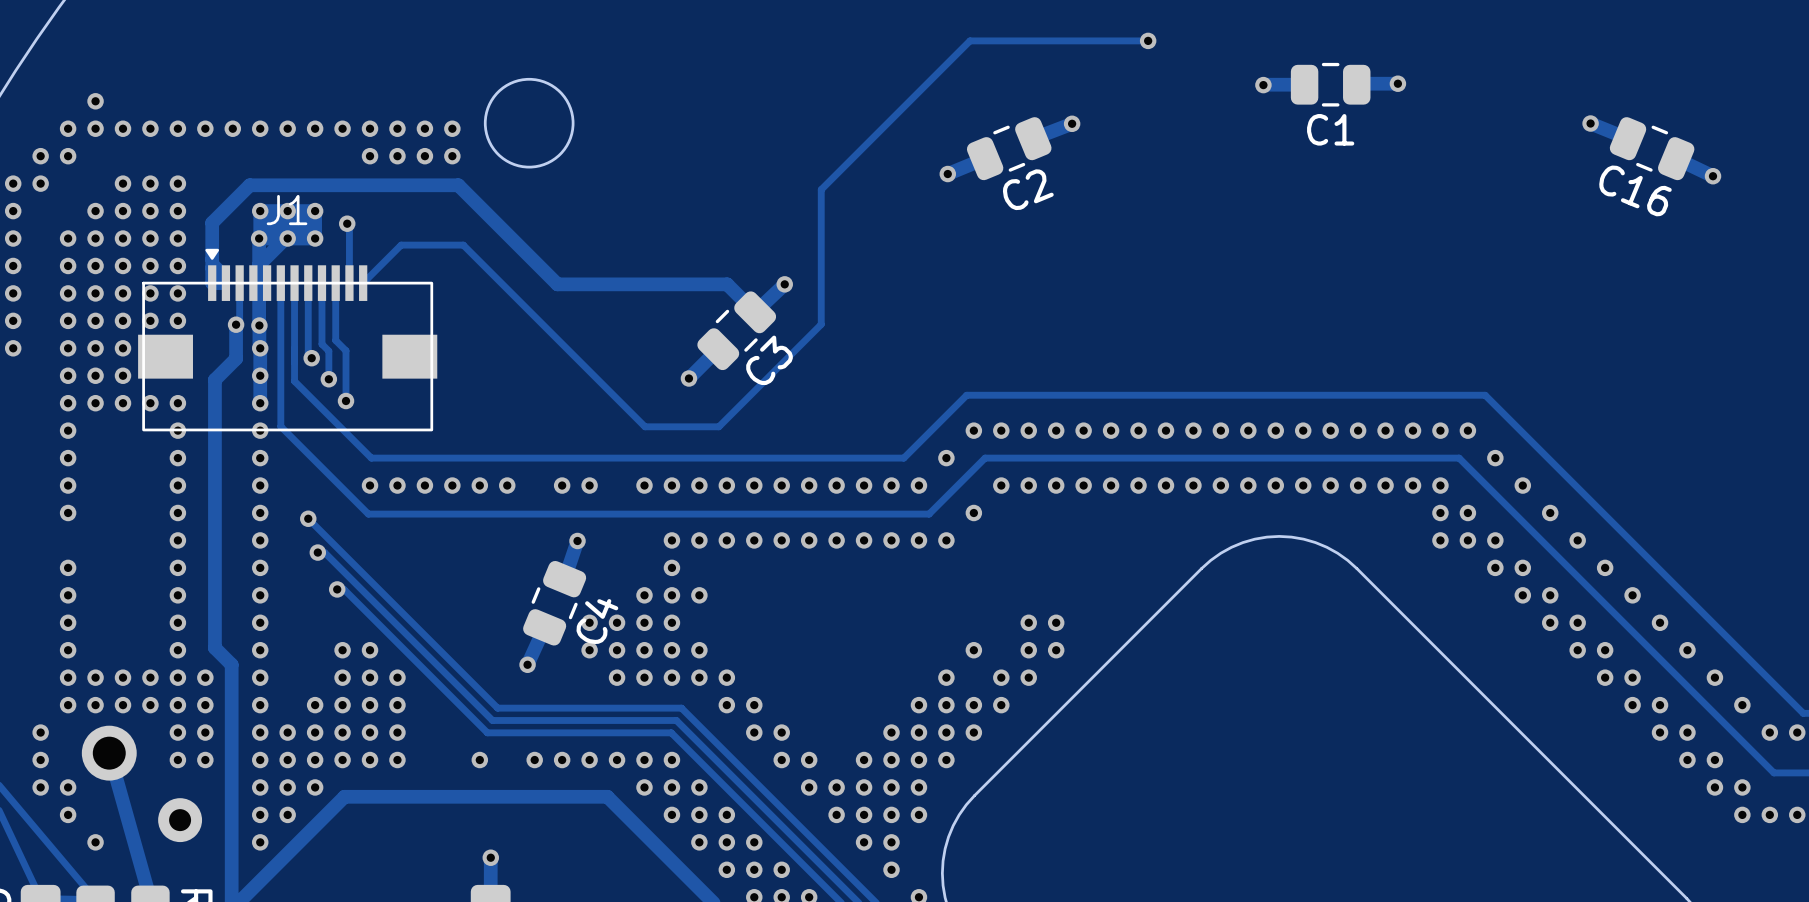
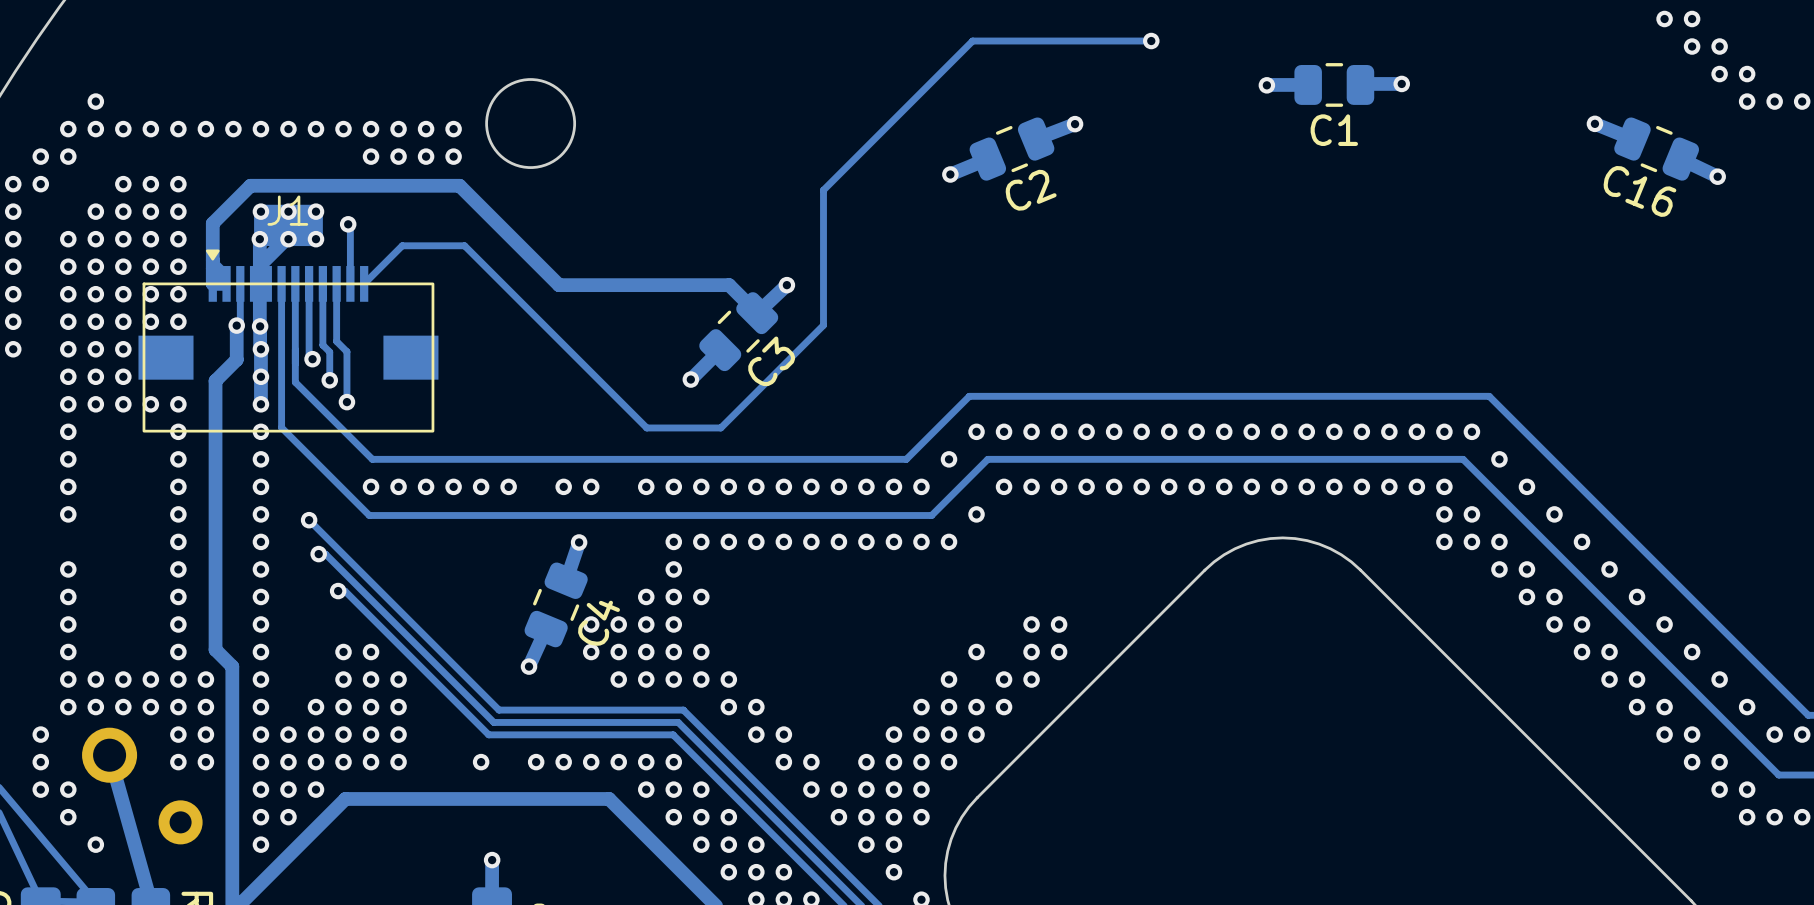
via: none -> (1664, 19)
via: none -> (1692, 19)
via: none -> (1692, 46)
via: none -> (1719, 46)
via: none -> (1719, 74)
via: none -> (1747, 74)
via: none -> (1747, 101)
via: none -> (1774, 101)
via: none -> (1802, 101)

